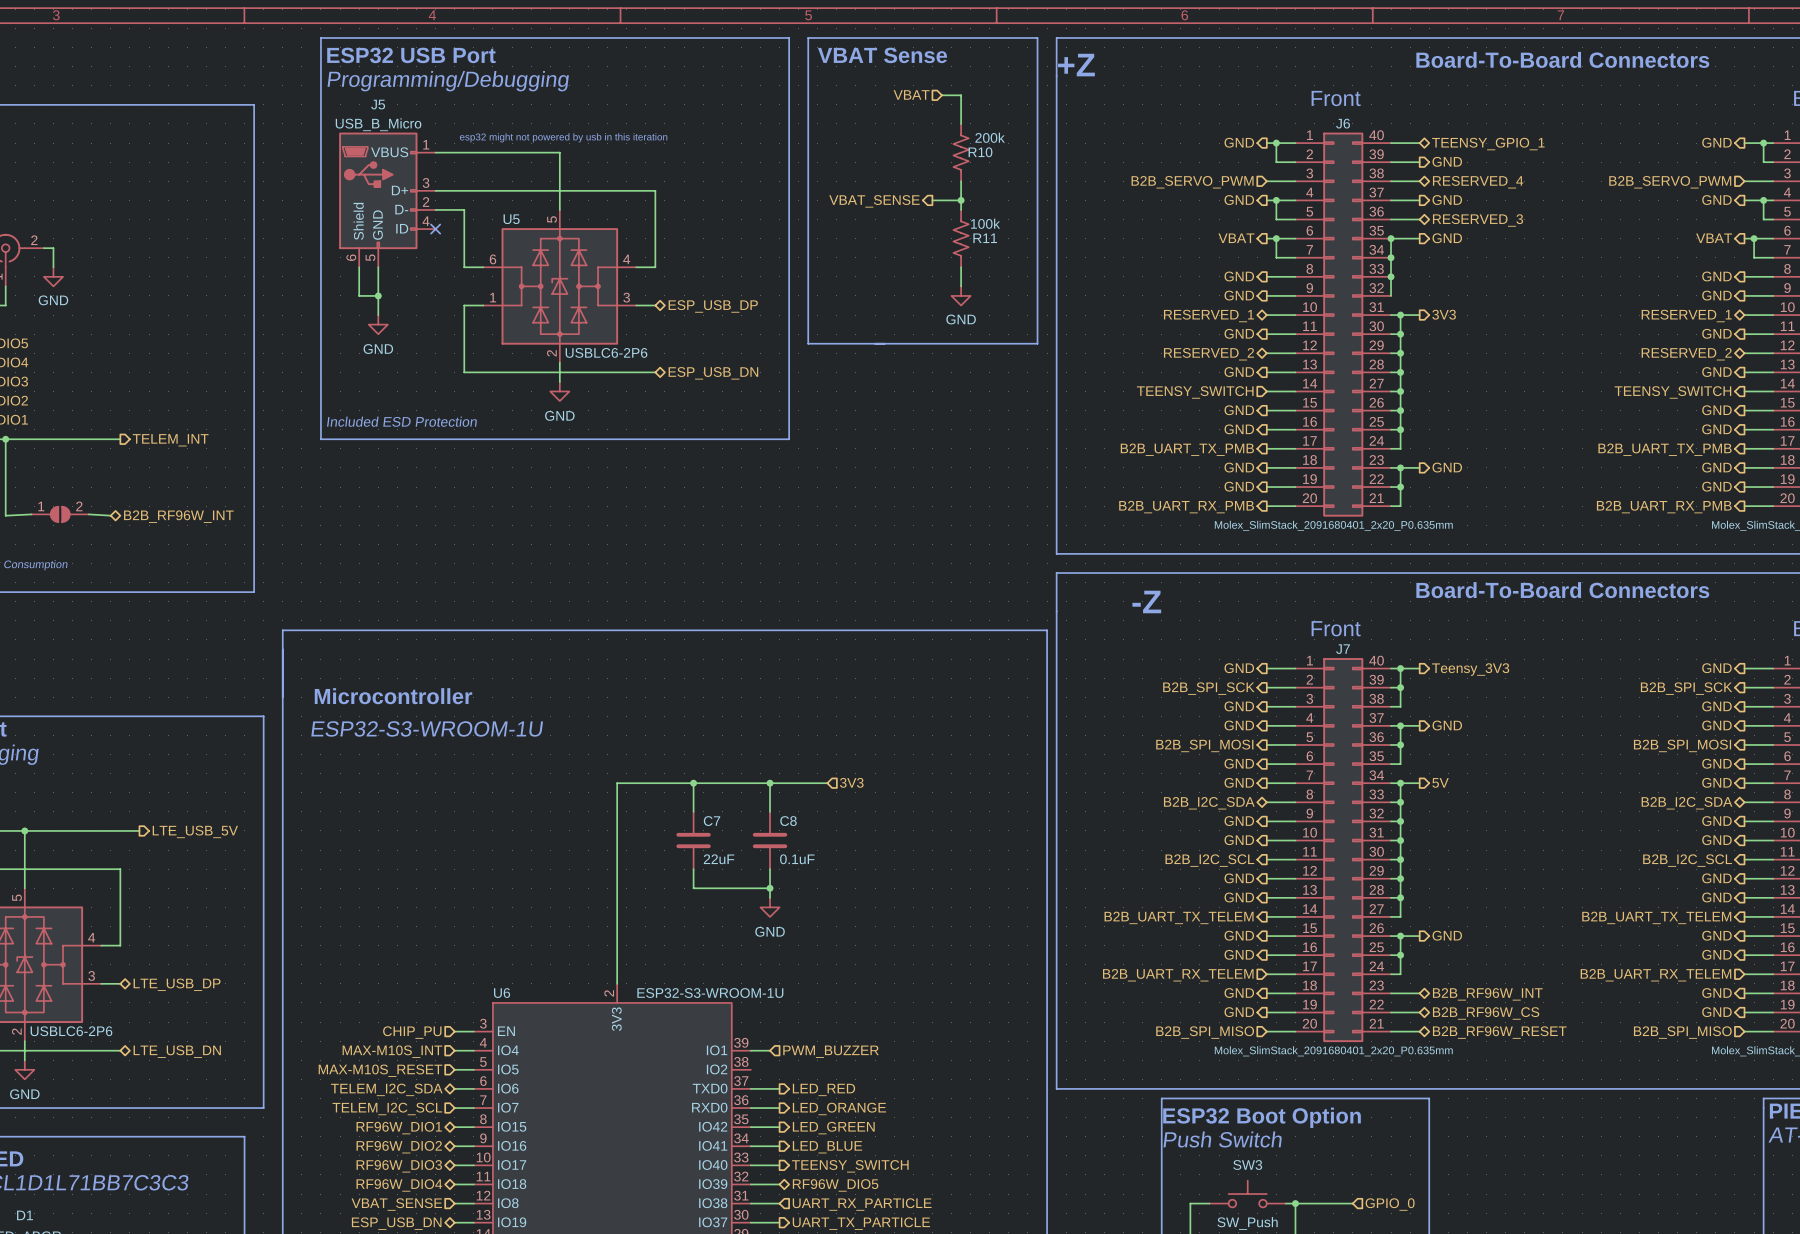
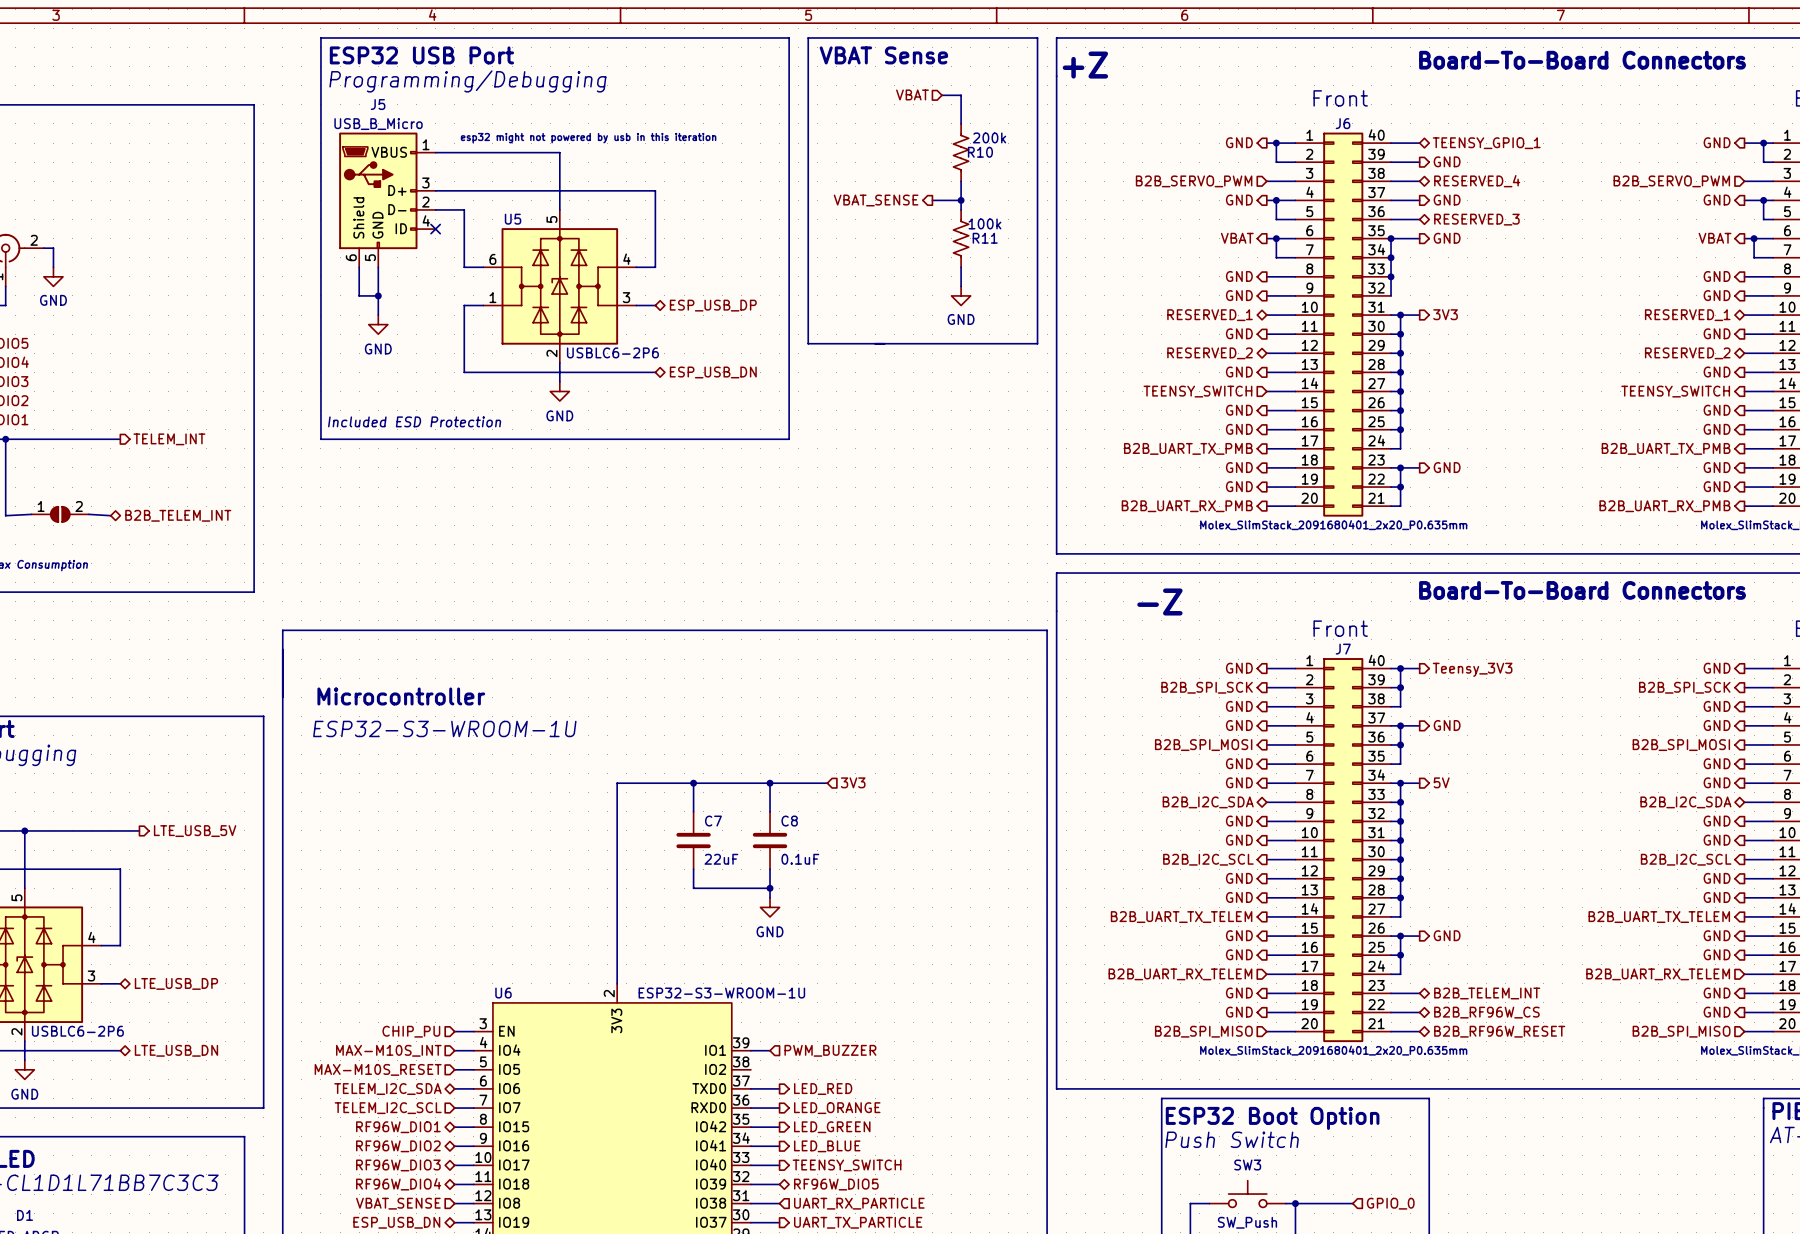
hierarchical label: B2B_RF96W_INT (178, 516) -> B2B_TELEM_INT (178, 515)
hierarchical label: B2B_RF96W_INT (1487, 994) -> B2B_TELEM_INT (1487, 993)

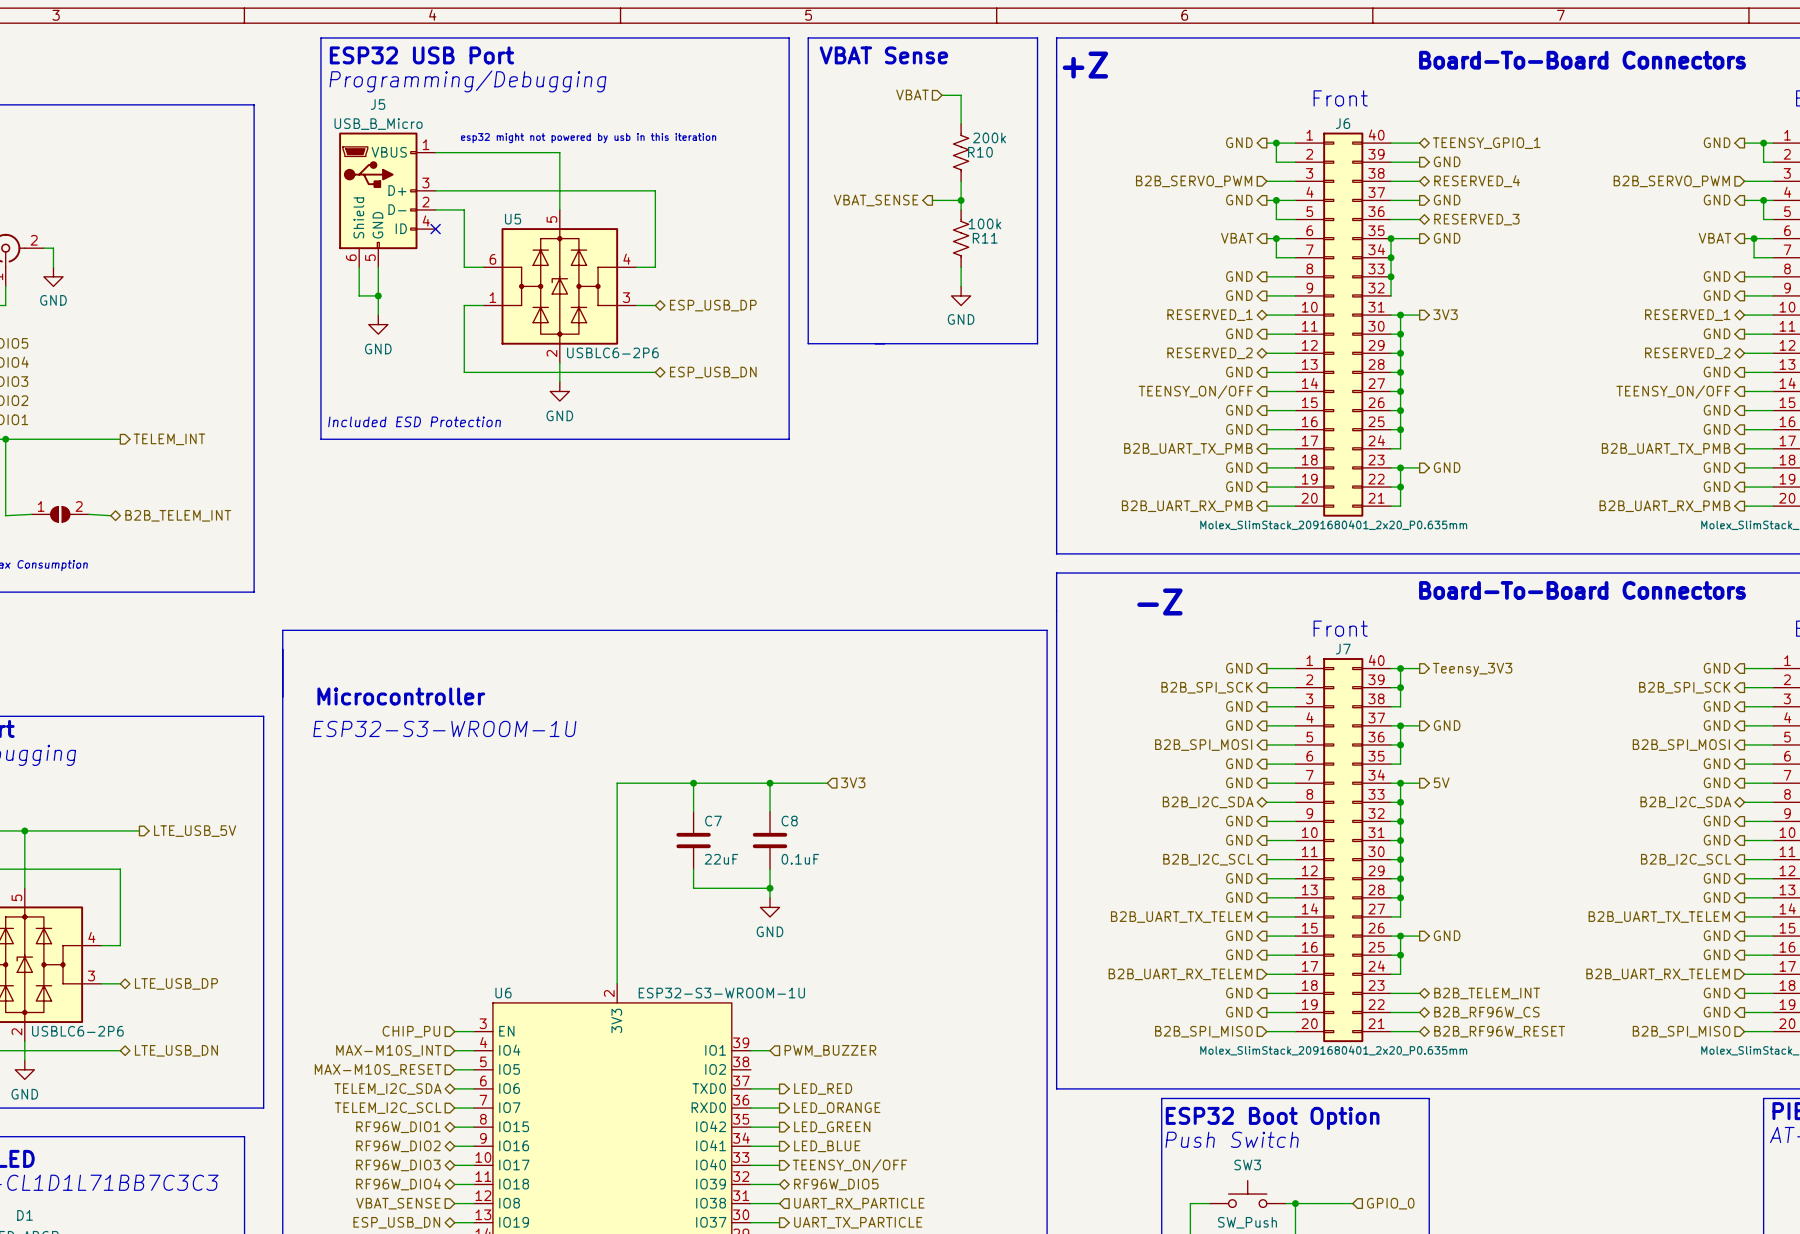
hierarchical label shape: input (1197, 391) -> output (1195, 392)
hierarchical label: TEENSY_SWITCH (1197, 391) -> TEENSY_ON/OFF (1195, 392)
hierarchical label: TEENSY_SWITCH (1675, 391) -> TEENSY_ON/OFF (1673, 392)
hierarchical label: TEENSY_SWITCH (847, 1165) -> TEENSY_ON/OFF (850, 1165)

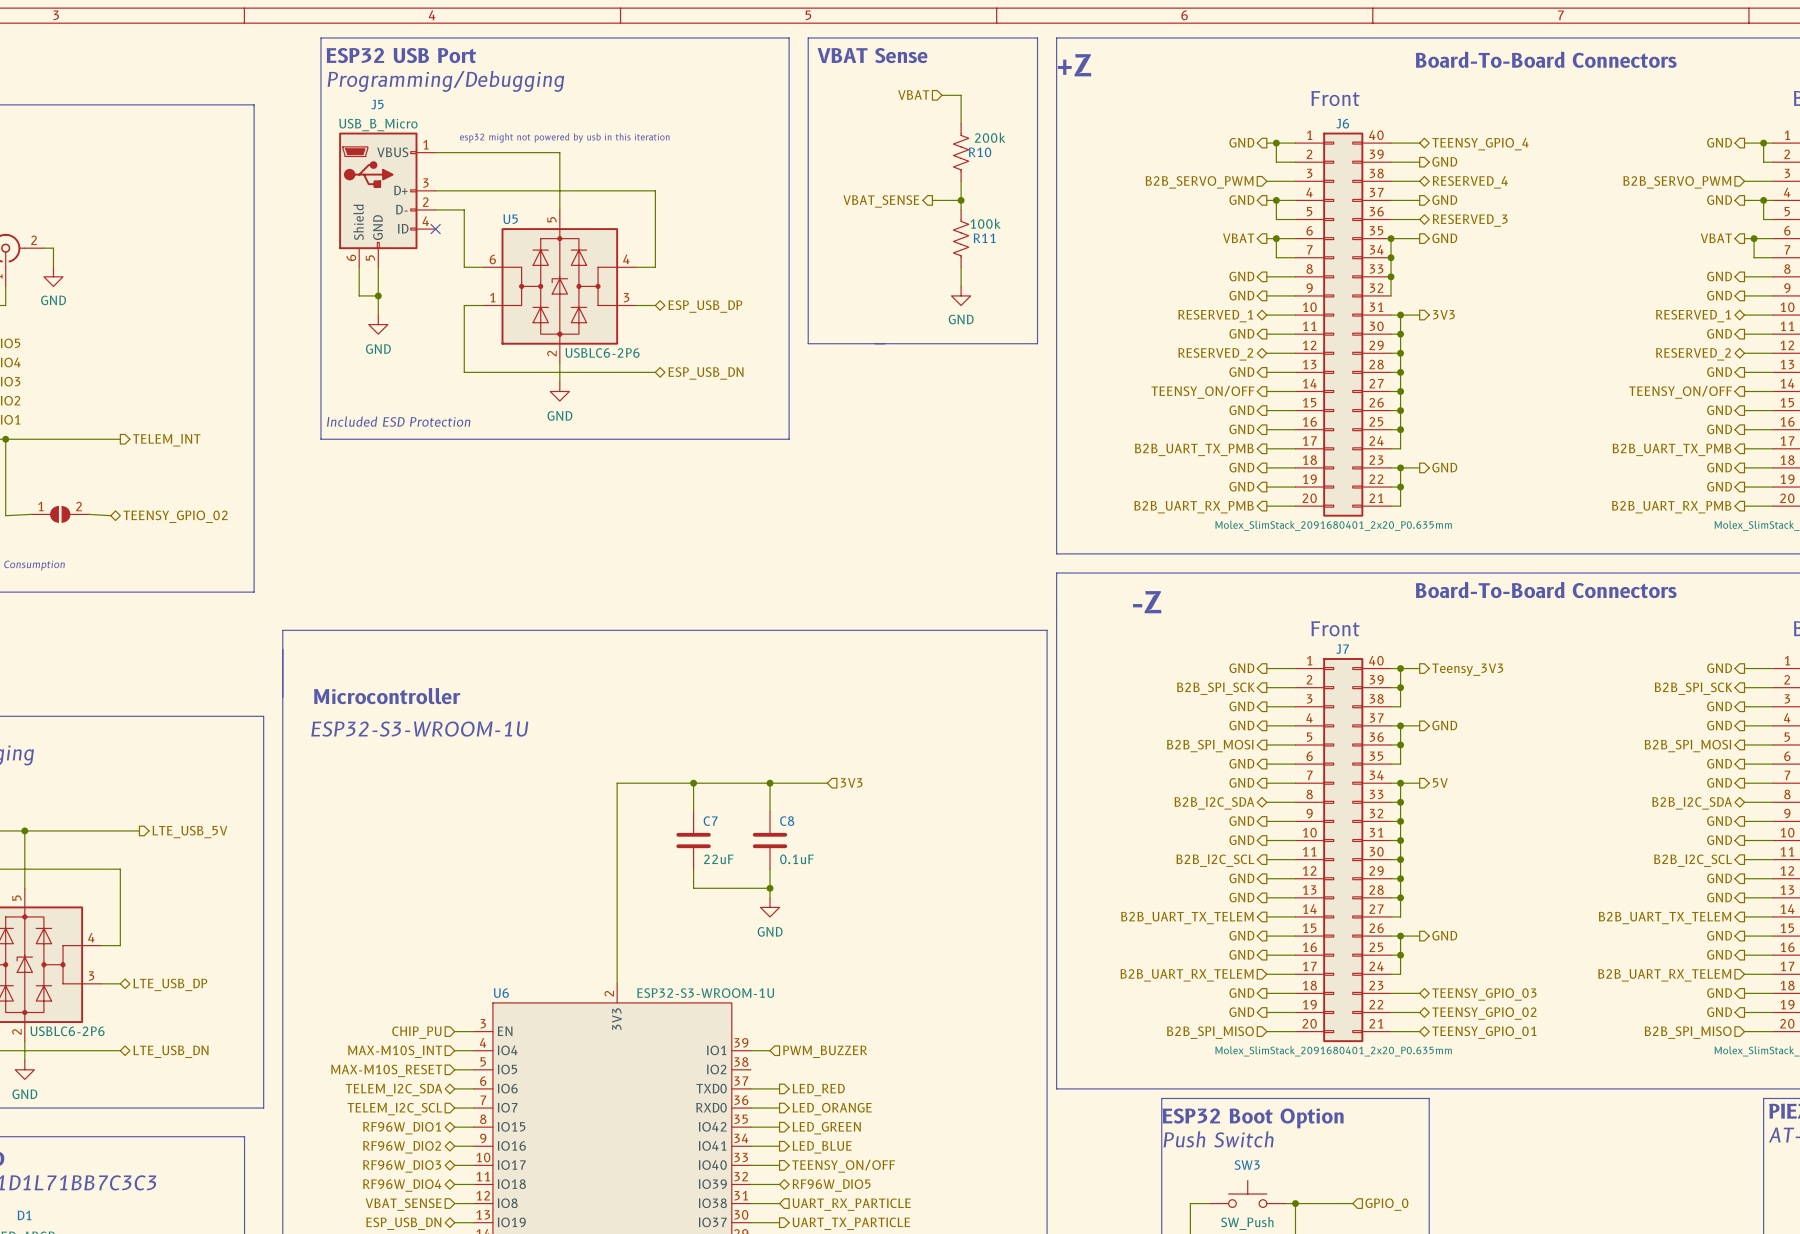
hierarchical label: TEENSY_GPIO_1 (1486, 143) -> TEENSY_GPIO_4 (1480, 144)
hierarchical label: B2B_TELEM_INT (178, 515) -> TEENSY_GPIO_02 (175, 516)
hierarchical label: B2B_TELEM_INT (1487, 993) -> TEENSY_GPIO_03 (1484, 994)
hierarchical label: B2B_RF96W_CS (1486, 1012) -> TEENSY_GPIO_02 (1484, 1013)
hierarchical label: B2B_RF96W_RESET (1499, 1031) -> TEENSY_GPIO_01 (1484, 1032)

